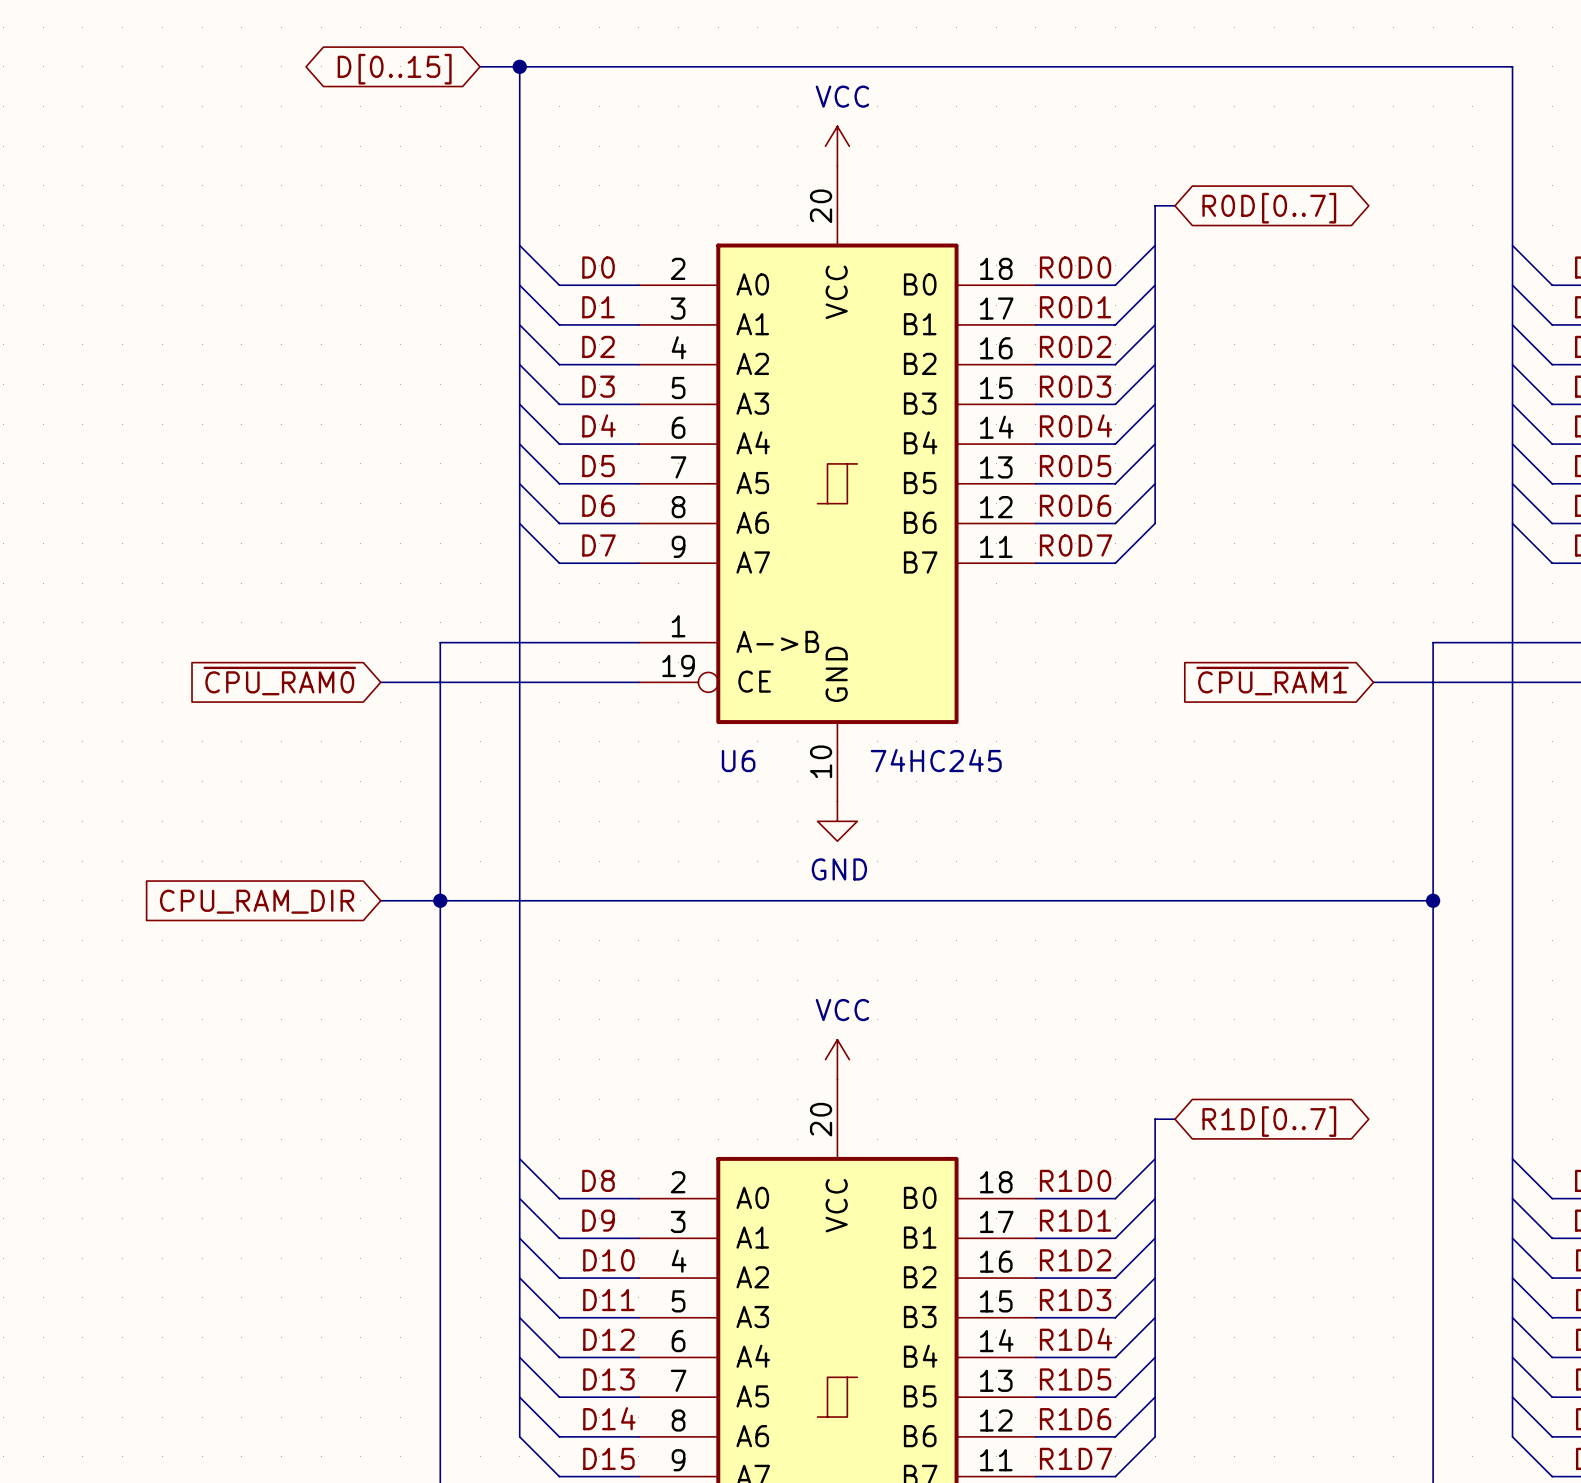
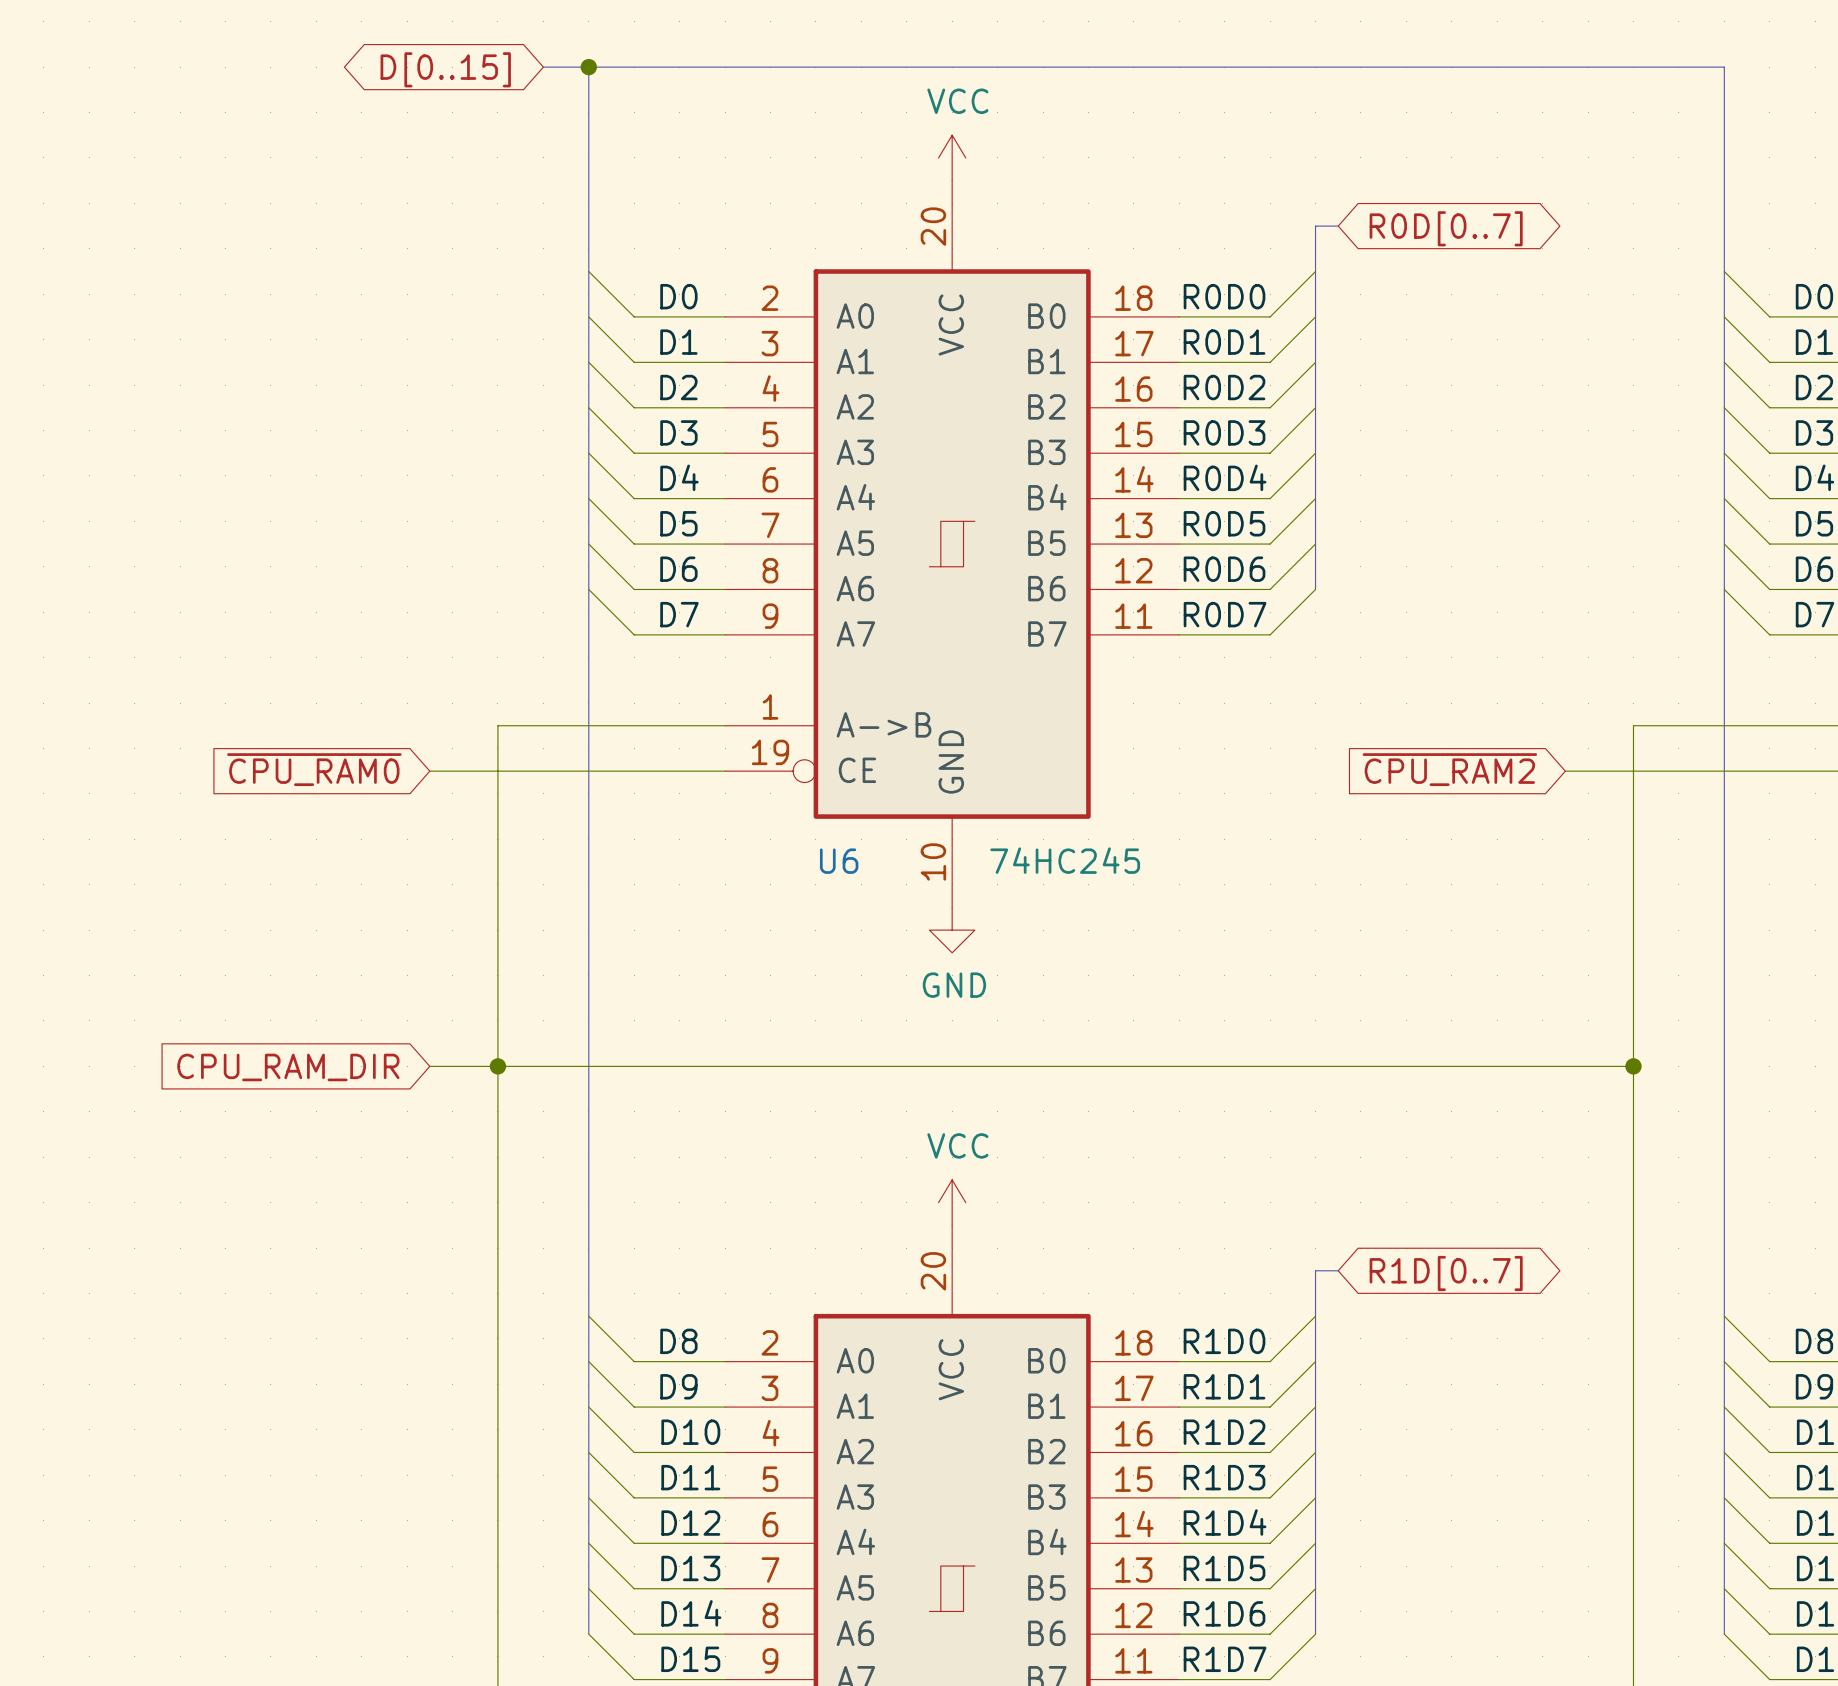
global label: ~{CPU_RAM1} (1272, 681) -> ~{CPU_RAM2} (1449, 769)
wire: (380, 900) (1433, 900) -> (429, 1066) (1633, 1066)
junction position: (440, 900) -> (497, 1066)
junction position: (1433, 900) -> (1633, 1066)
global label position: CPU_RAM_DIR (257, 901) -> CPU_RAM_DIR (288, 1067)

